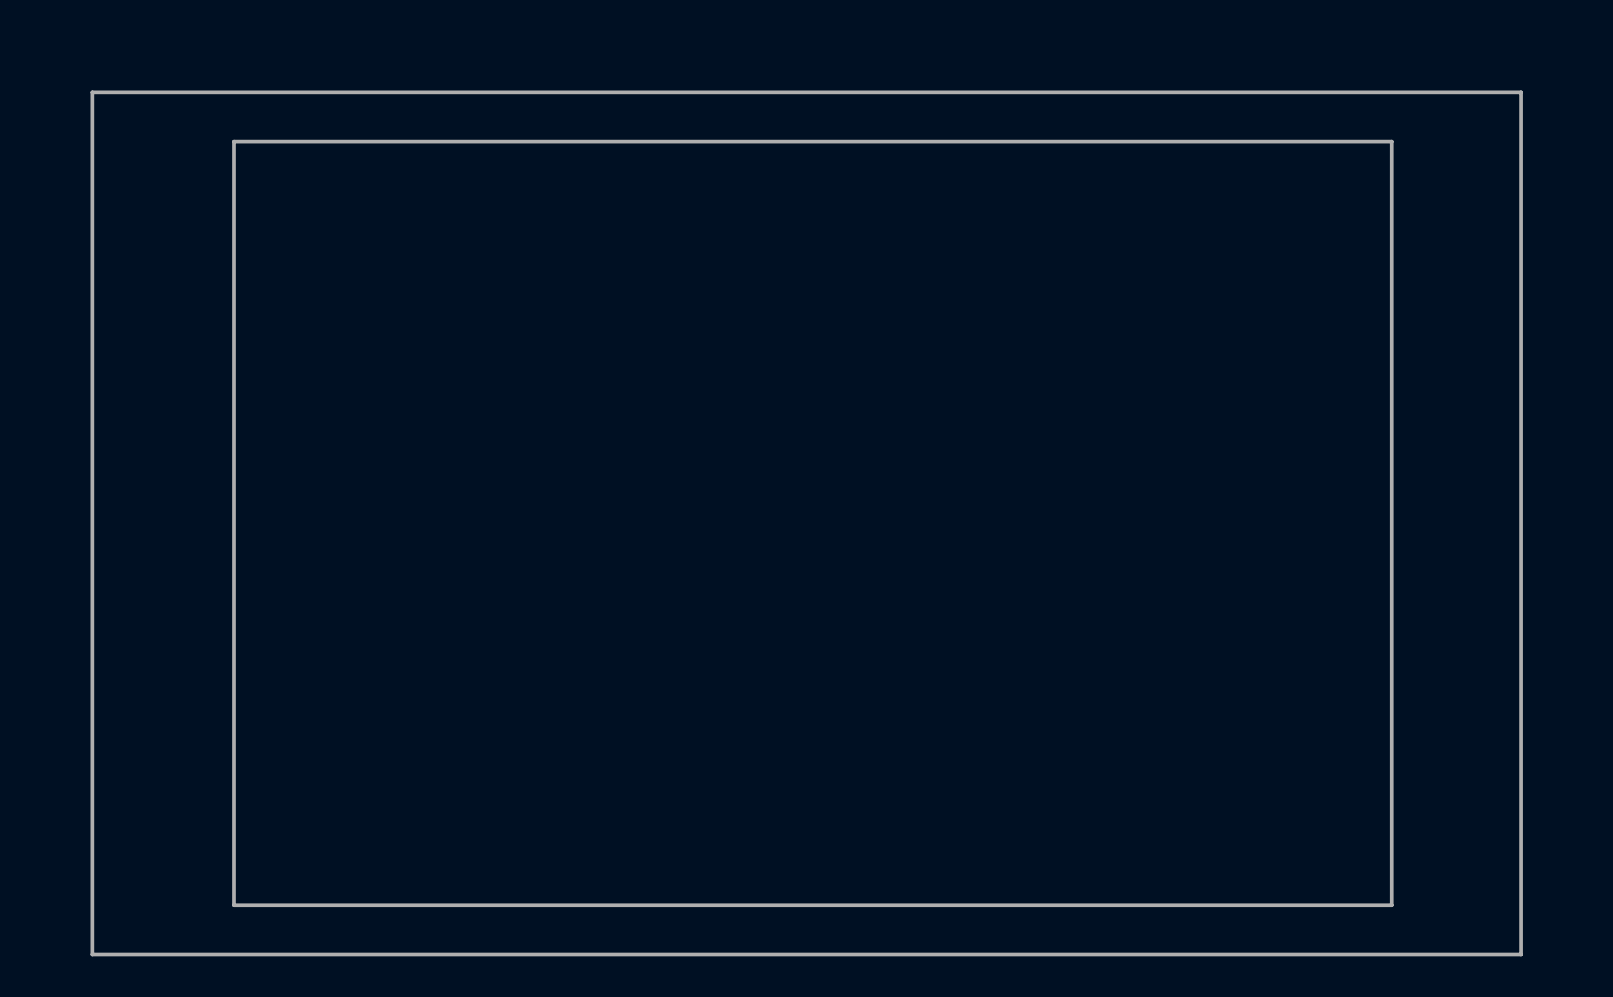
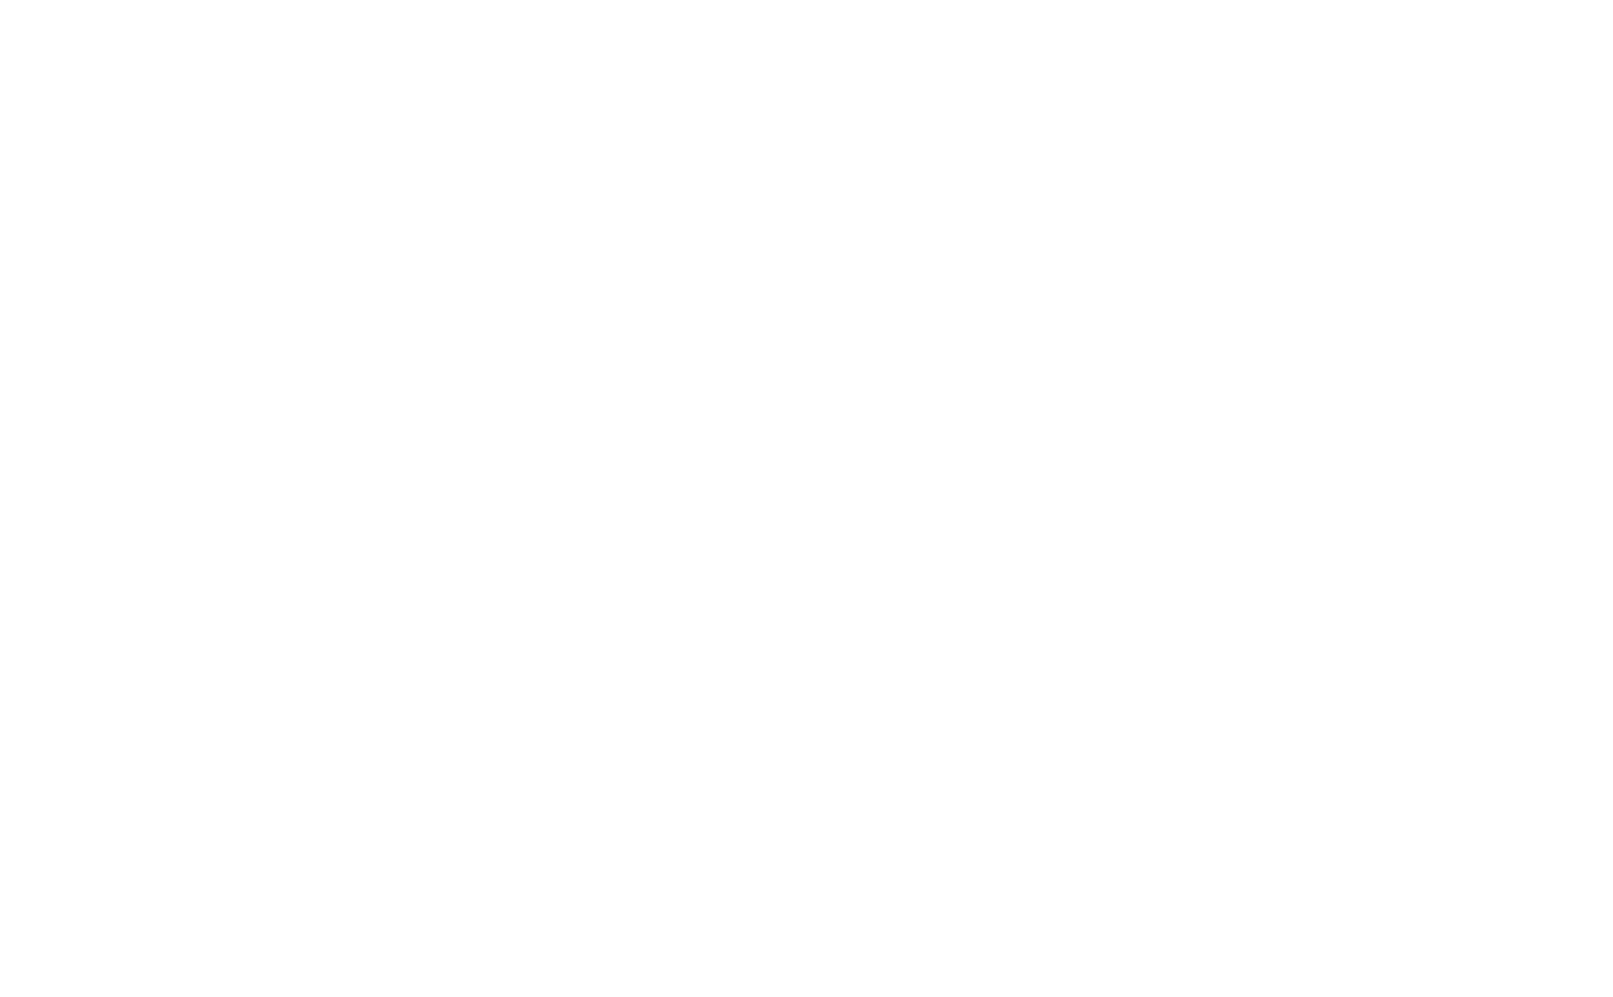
line: (92, 92) (1521, 92) (1521, 954) (92, 954) (92, 92) -> none
line: (233, 141) (233, 905) (1391, 905) (1391, 141) (233, 141) -> none

